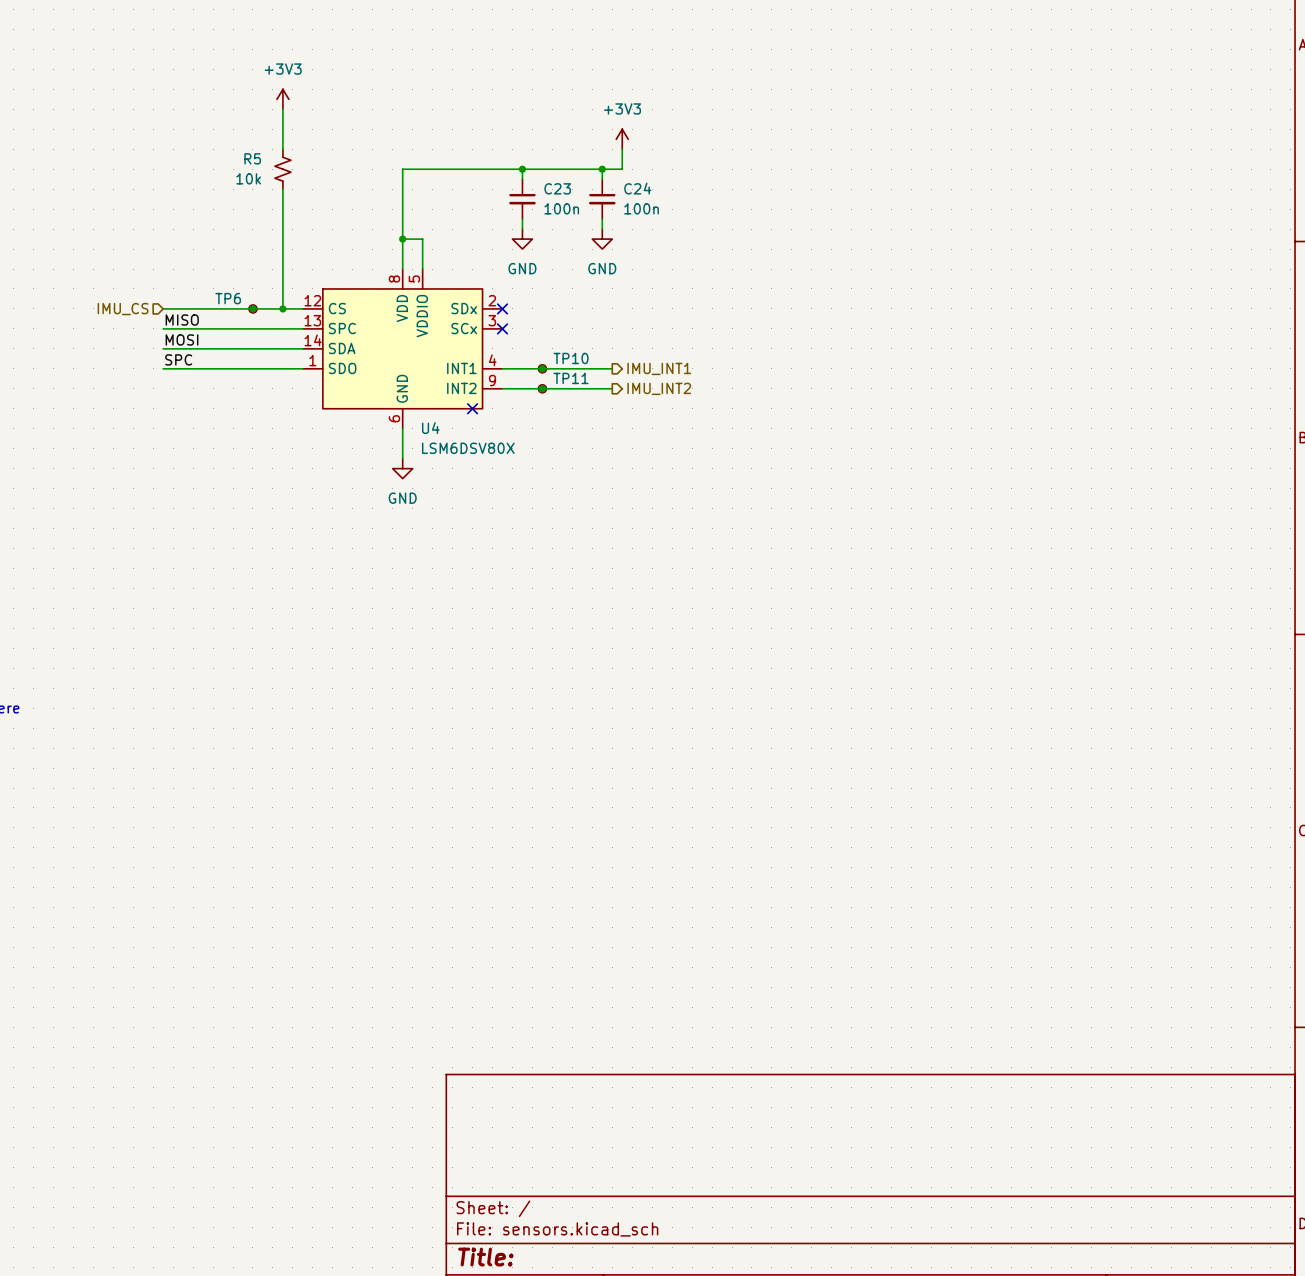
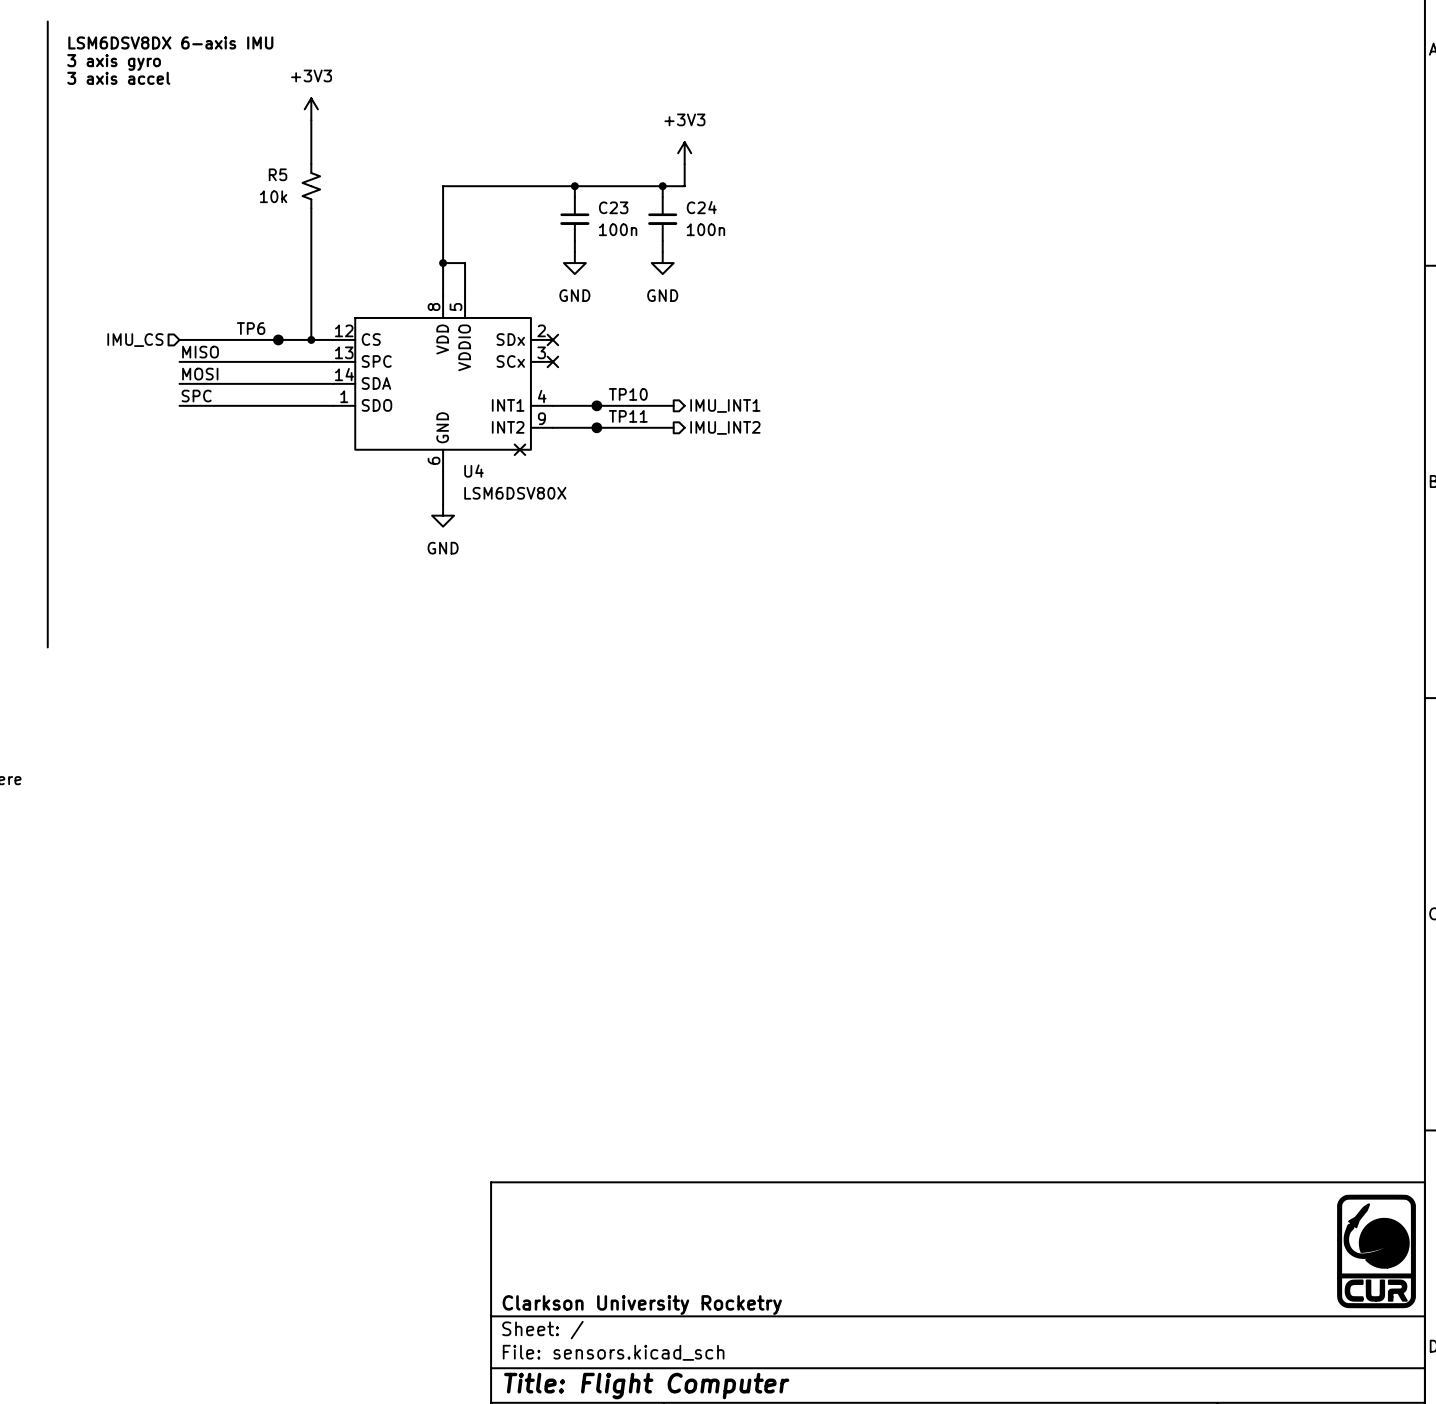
line: none -> (47, 21) (47, 647)
text: none -> LSM6DSV8DX 6-axis IMU (170, 42)
text: none -> 3 axis gyro (114, 62)
text: none -> 3 axis accel (118, 78)
power symbol: none -> (1376, 1251)
title block: none -> Clarkson University Rocketry (642, 1305)
title block: Title: (485, 1257) -> Title: Flight Computer (646, 1386)

